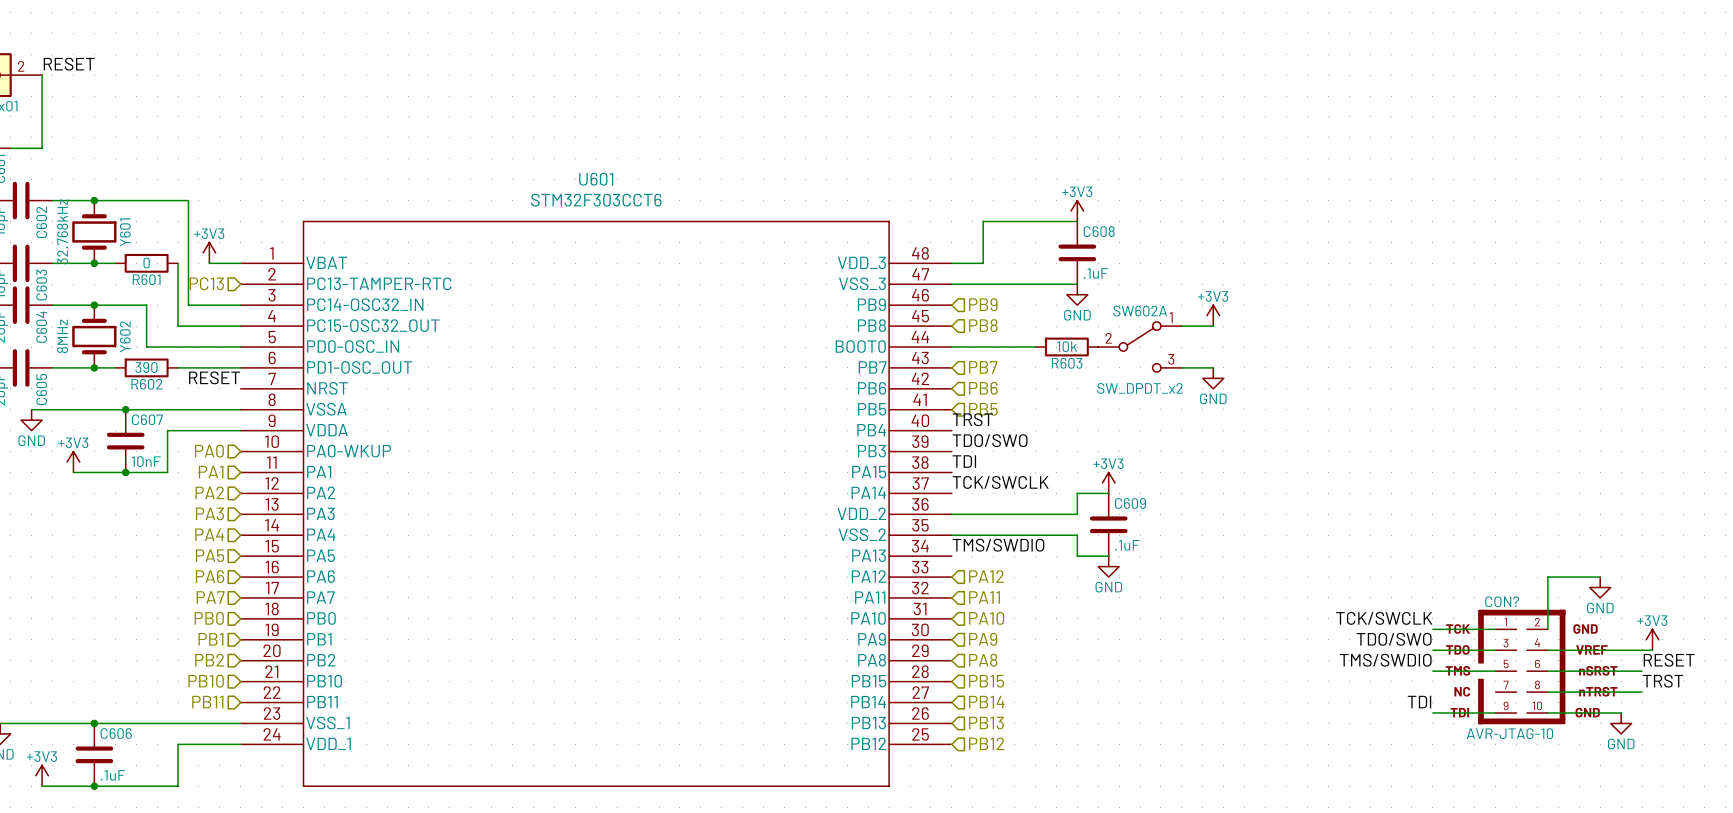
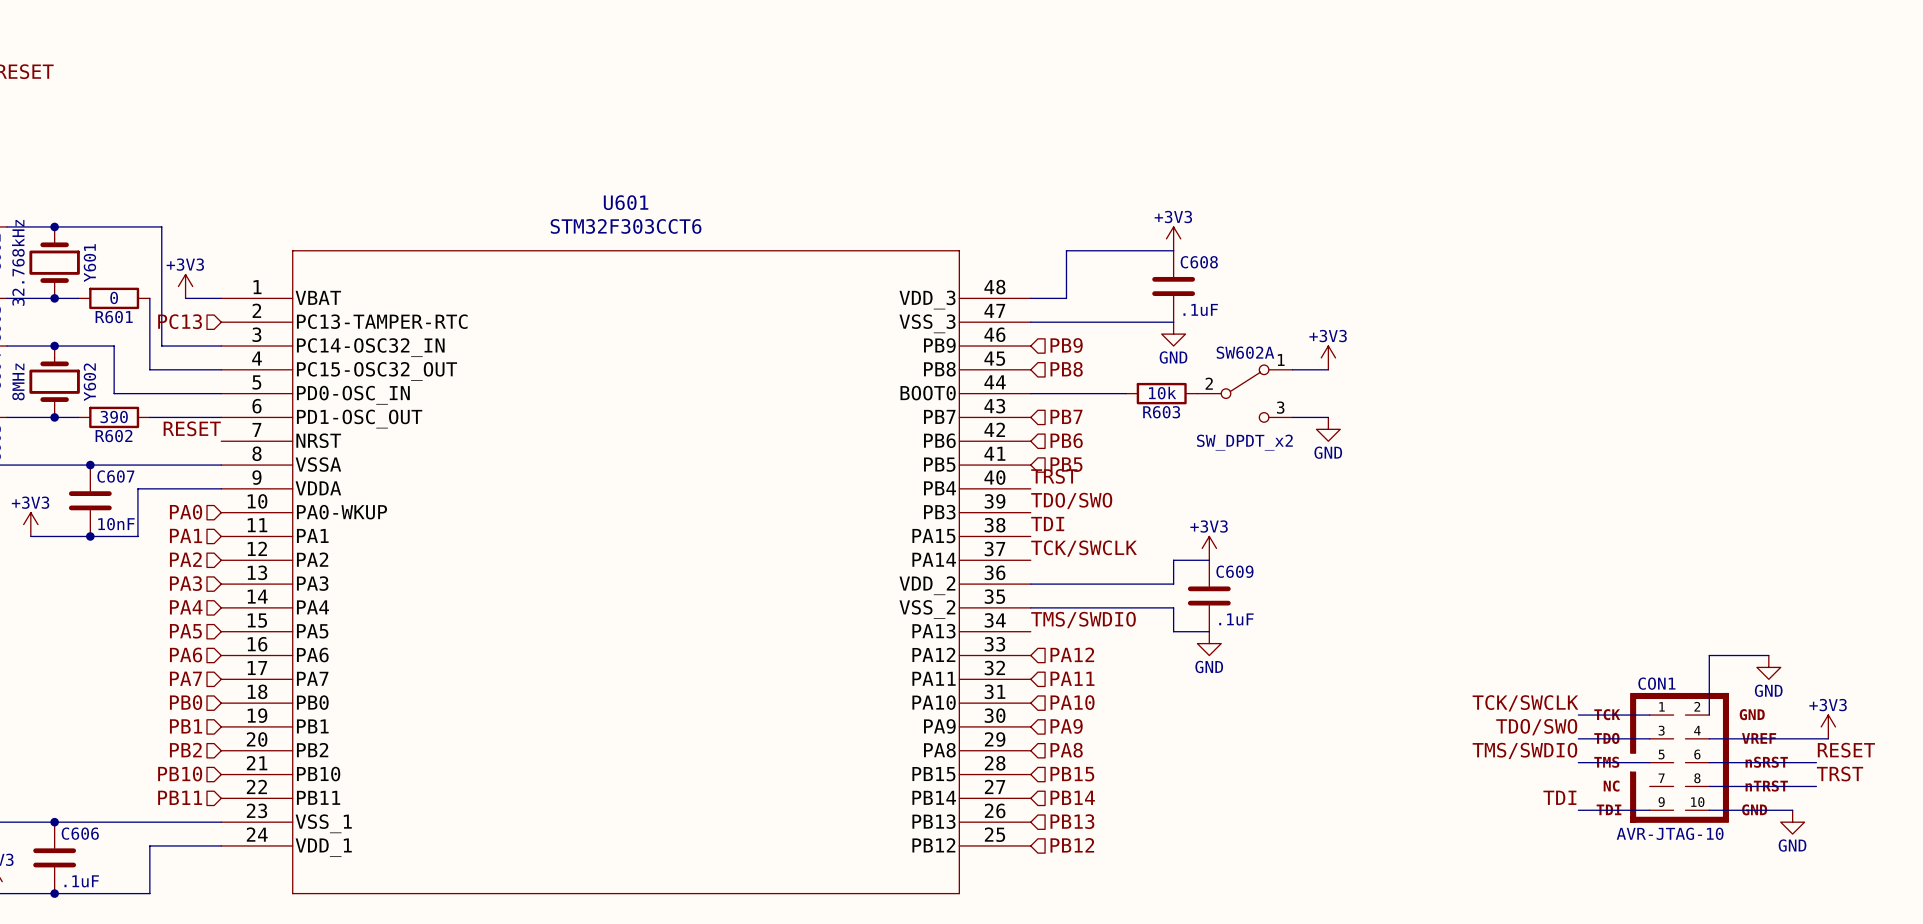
CON? name: CON? (1502, 601) -> CON1 (1656, 683)

